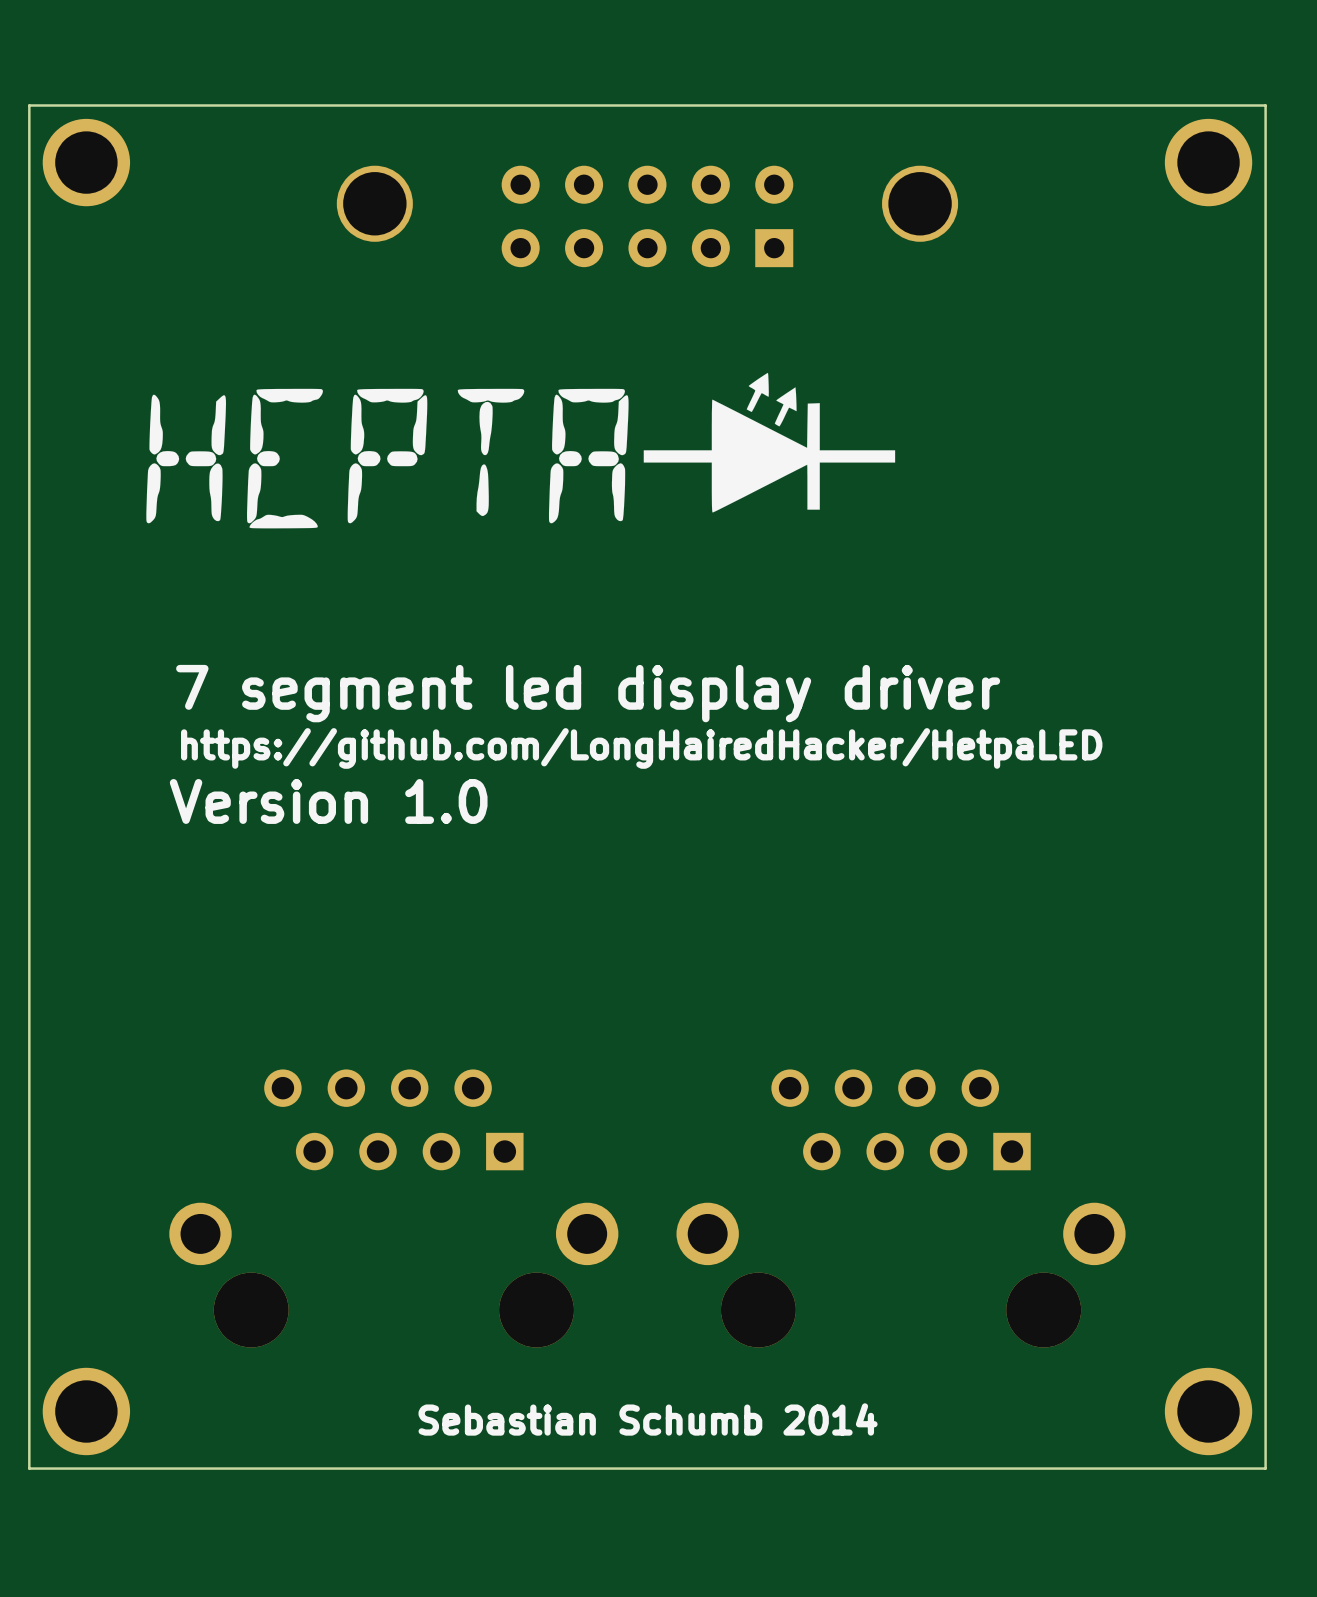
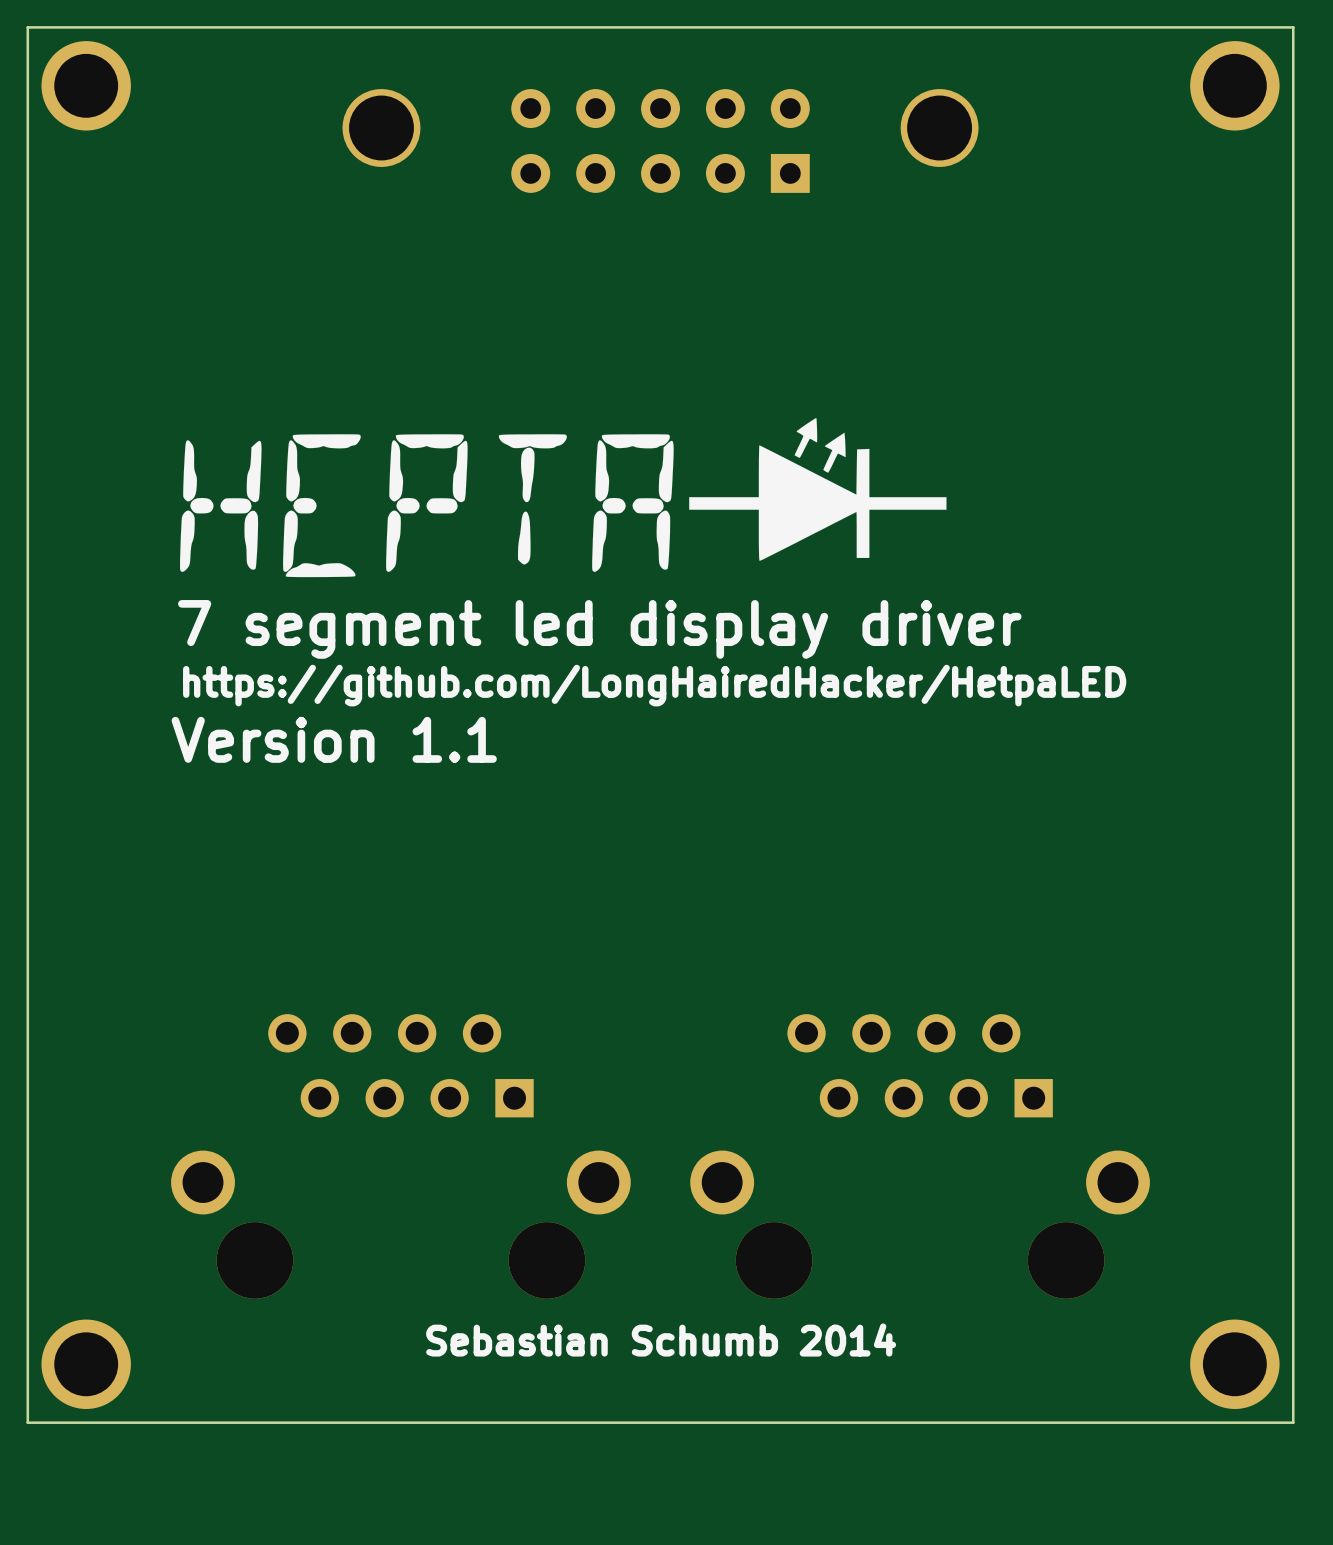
drawing position: (520, 450) -> (563, 497)
text: Version 1.0 (328, 801) -> Version 1.1 (334, 739)
text position: Sebastian Schumb 2014 (648, 1419) -> Sebastian Schumb 2014 (661, 1340)

